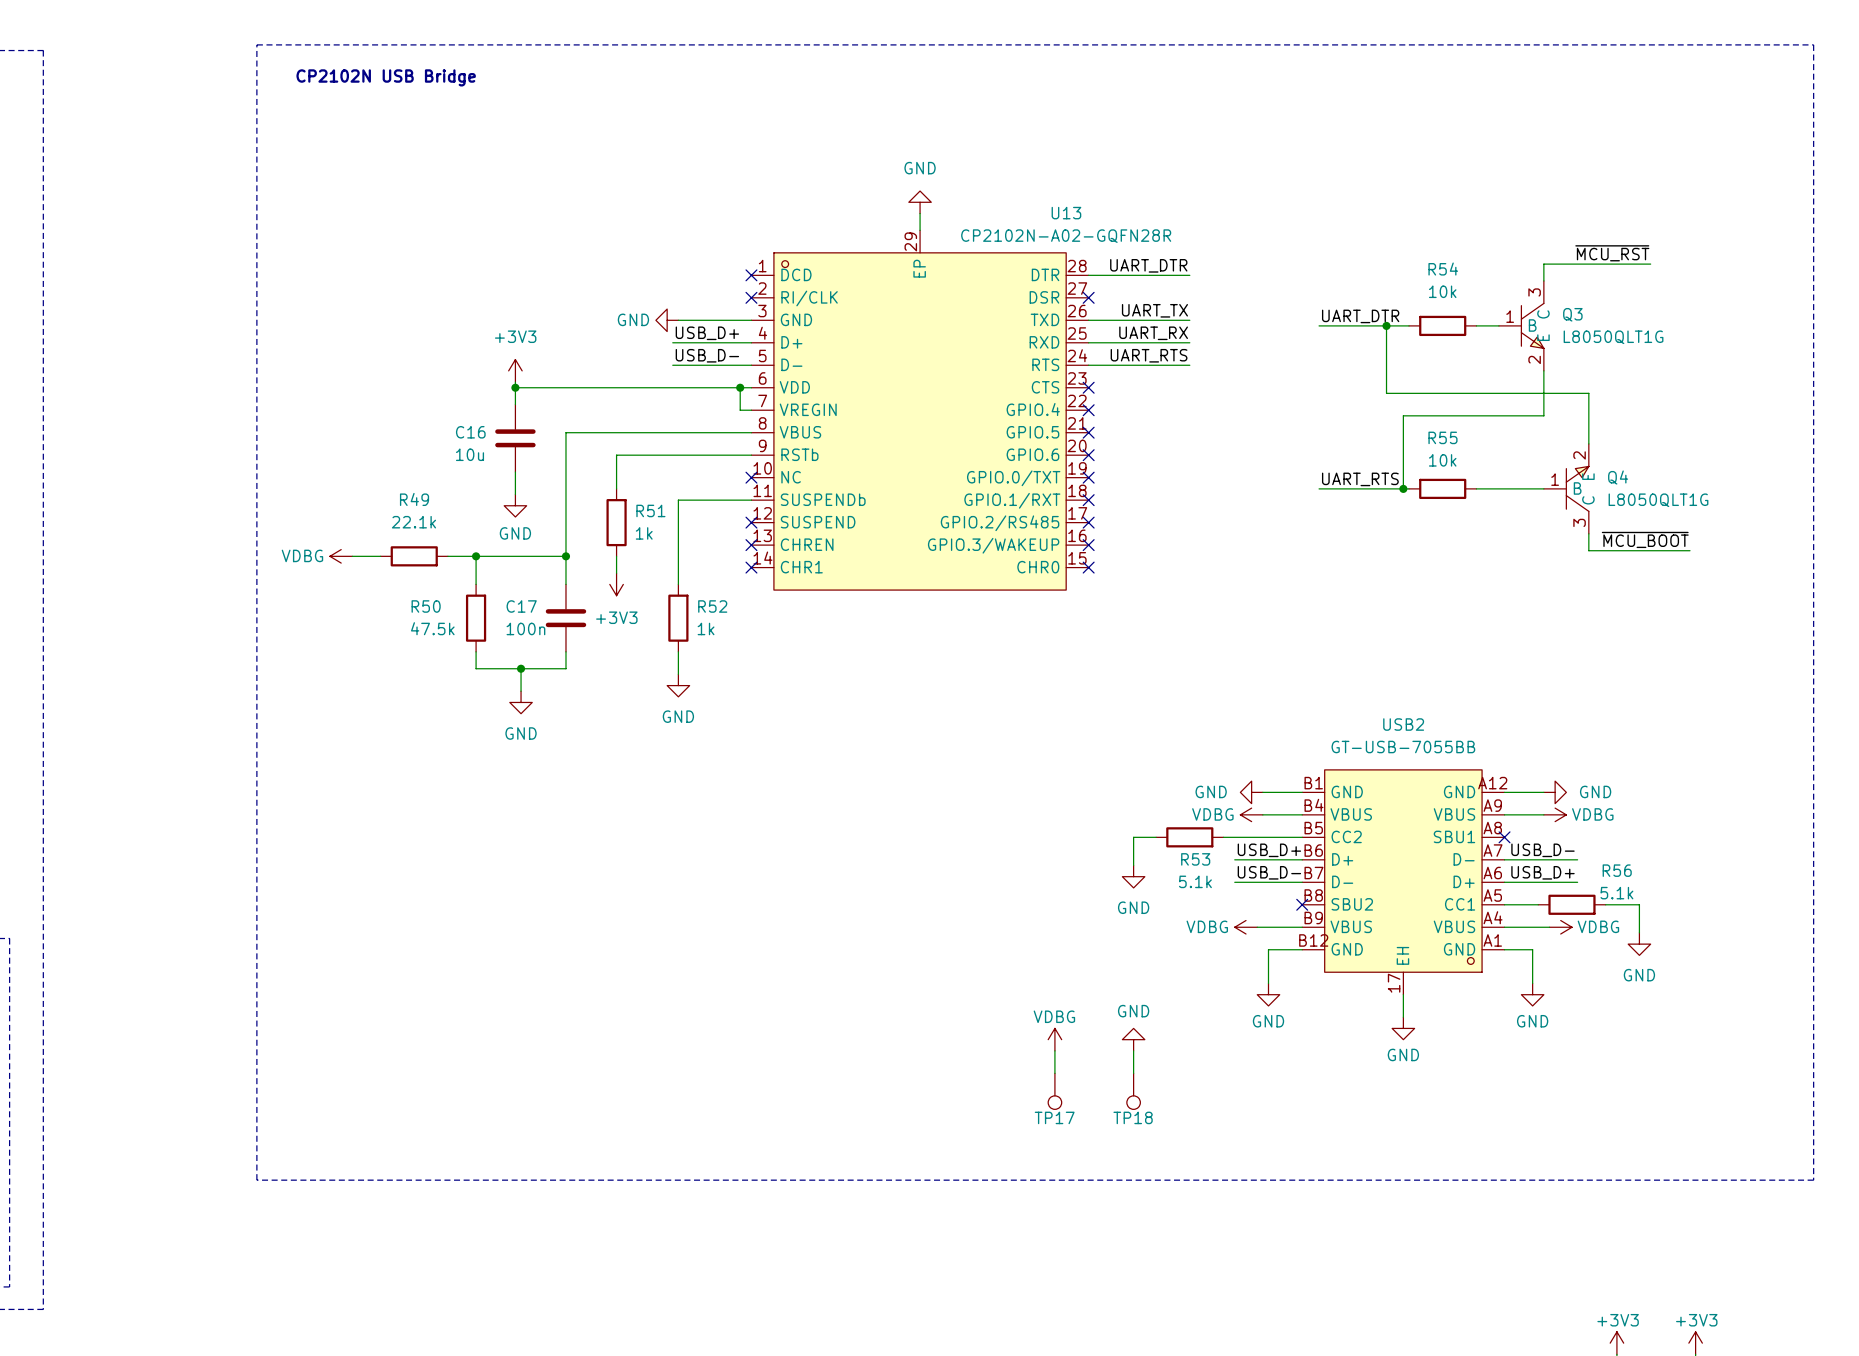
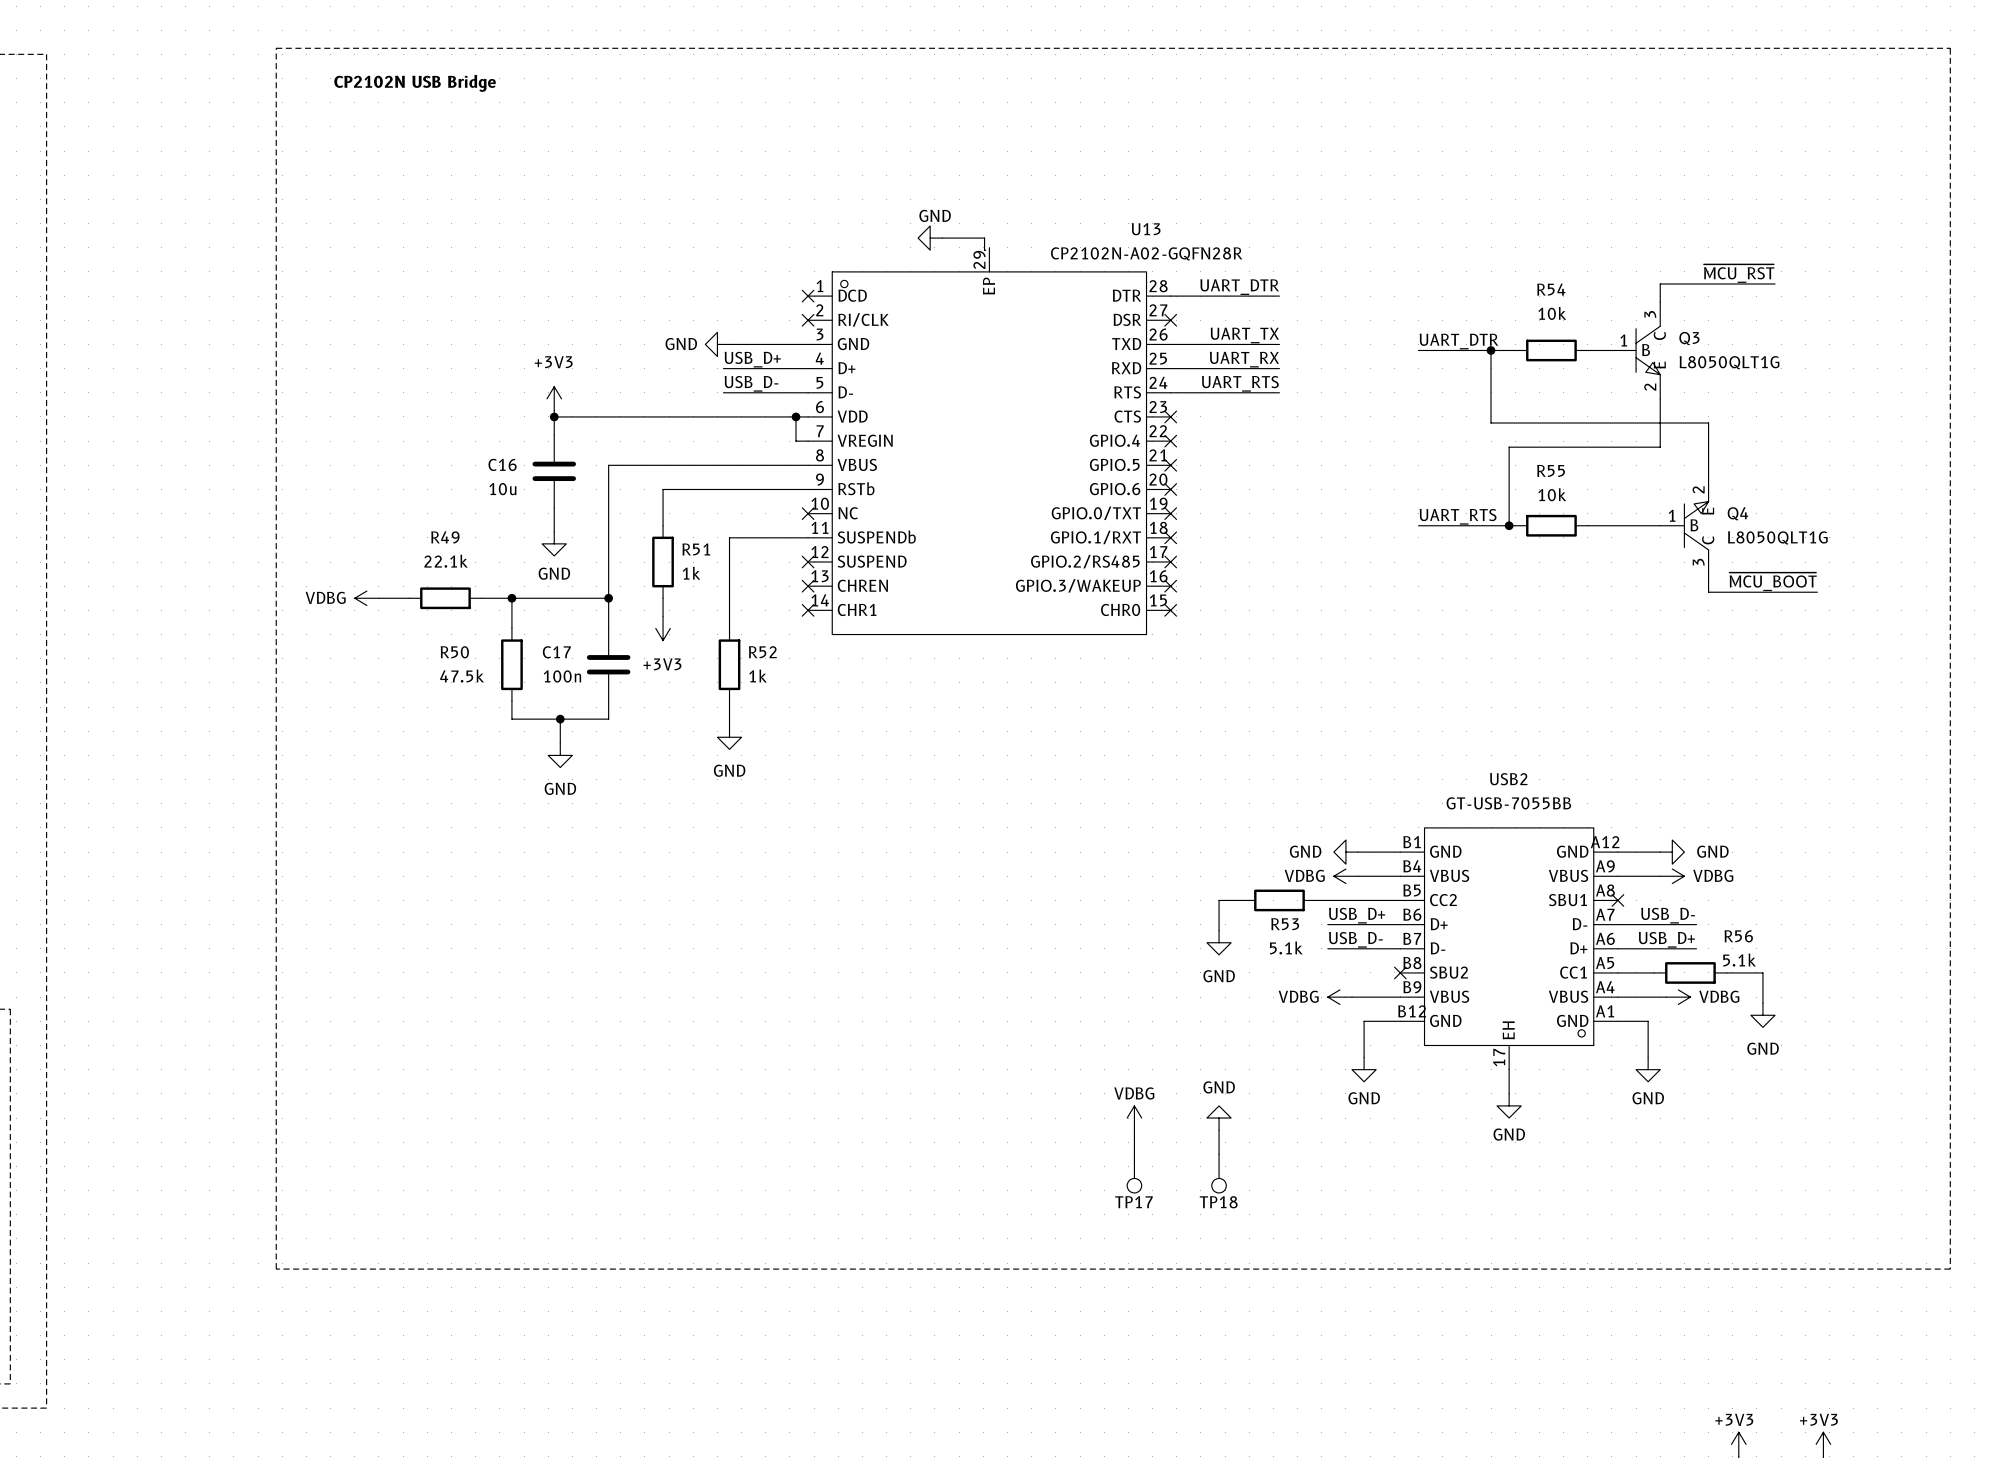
power symbol rotation: 0° (920, 202) -> 90° counterclockwise (930, 238)
power symbol position: GND (920, 202) -> GND (930, 238)
wire: (920, 213) (920, 230) -> none
wire: none -> (942, 238) (984, 238) (985, 250)

